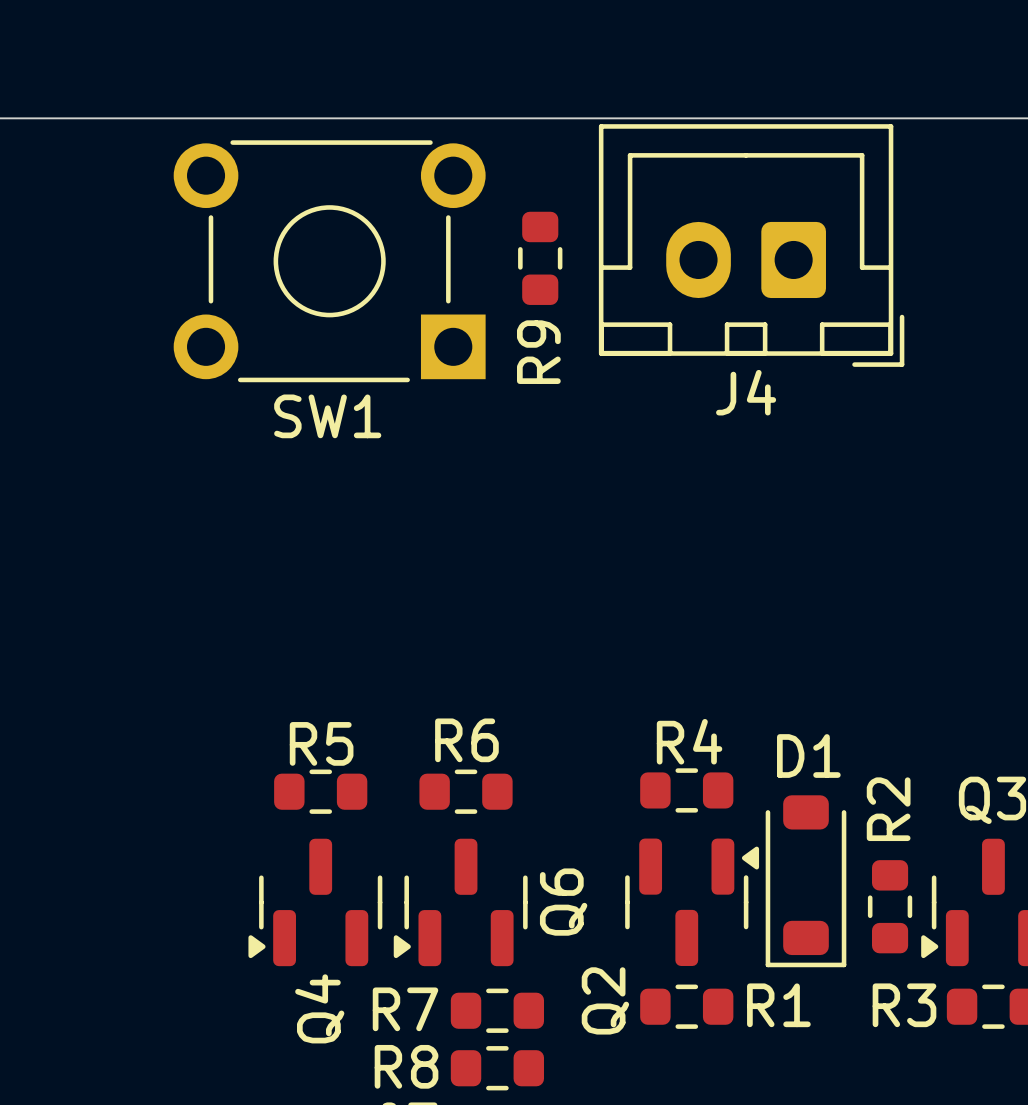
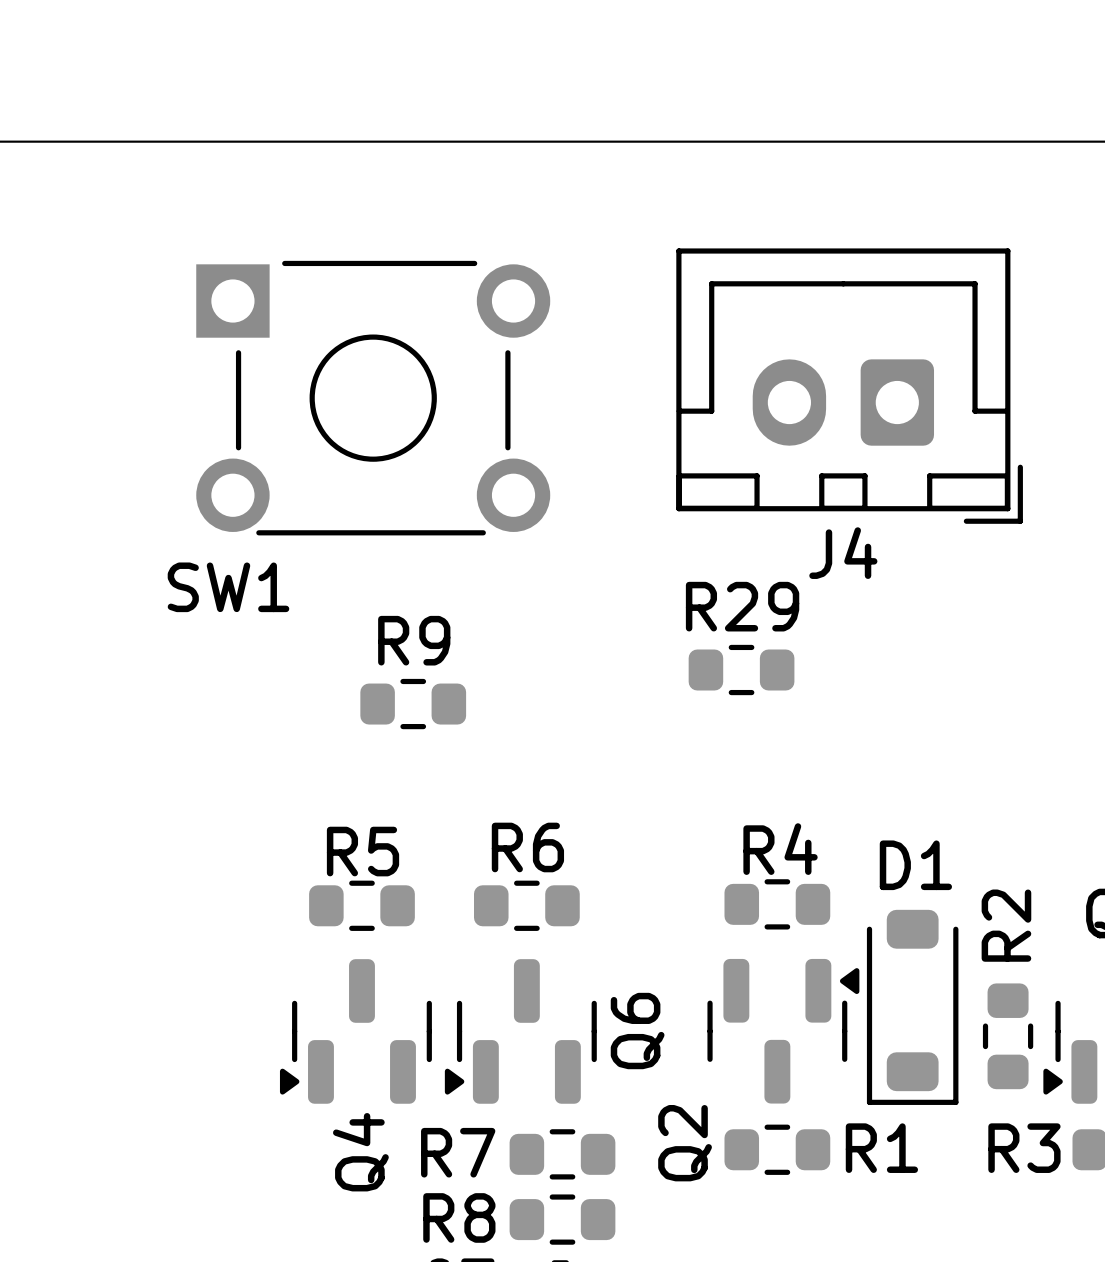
J4 position: (751, 245) -> (849, 386)
R9 rotation: 0° (540, 258) -> 90° clockwise (413, 704)
R9 position: (540, 258) -> (413, 704)
SW1 rotation: 0° (329, 261) -> 180° (373, 398)
R9 name position: R9 (538, 352) -> R9 (414, 640)
SW1 name position: SW1 (327, 416) -> SW1 (228, 587)
R29: none -> (741, 670)

